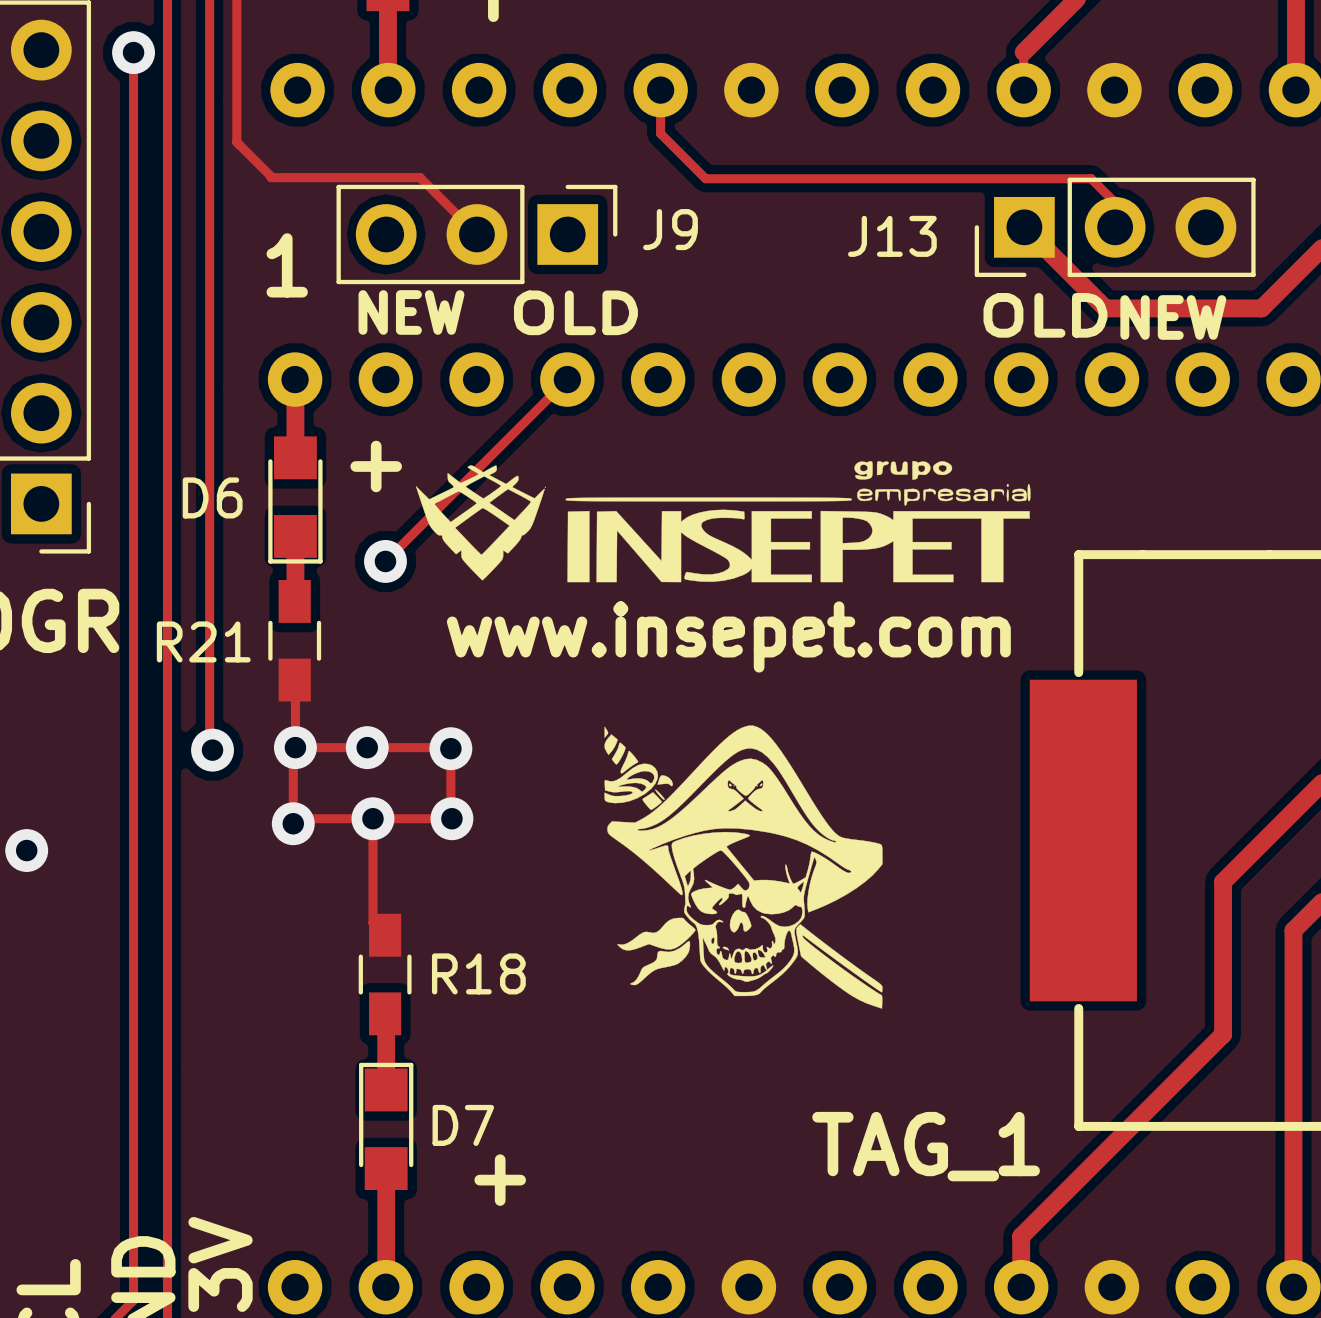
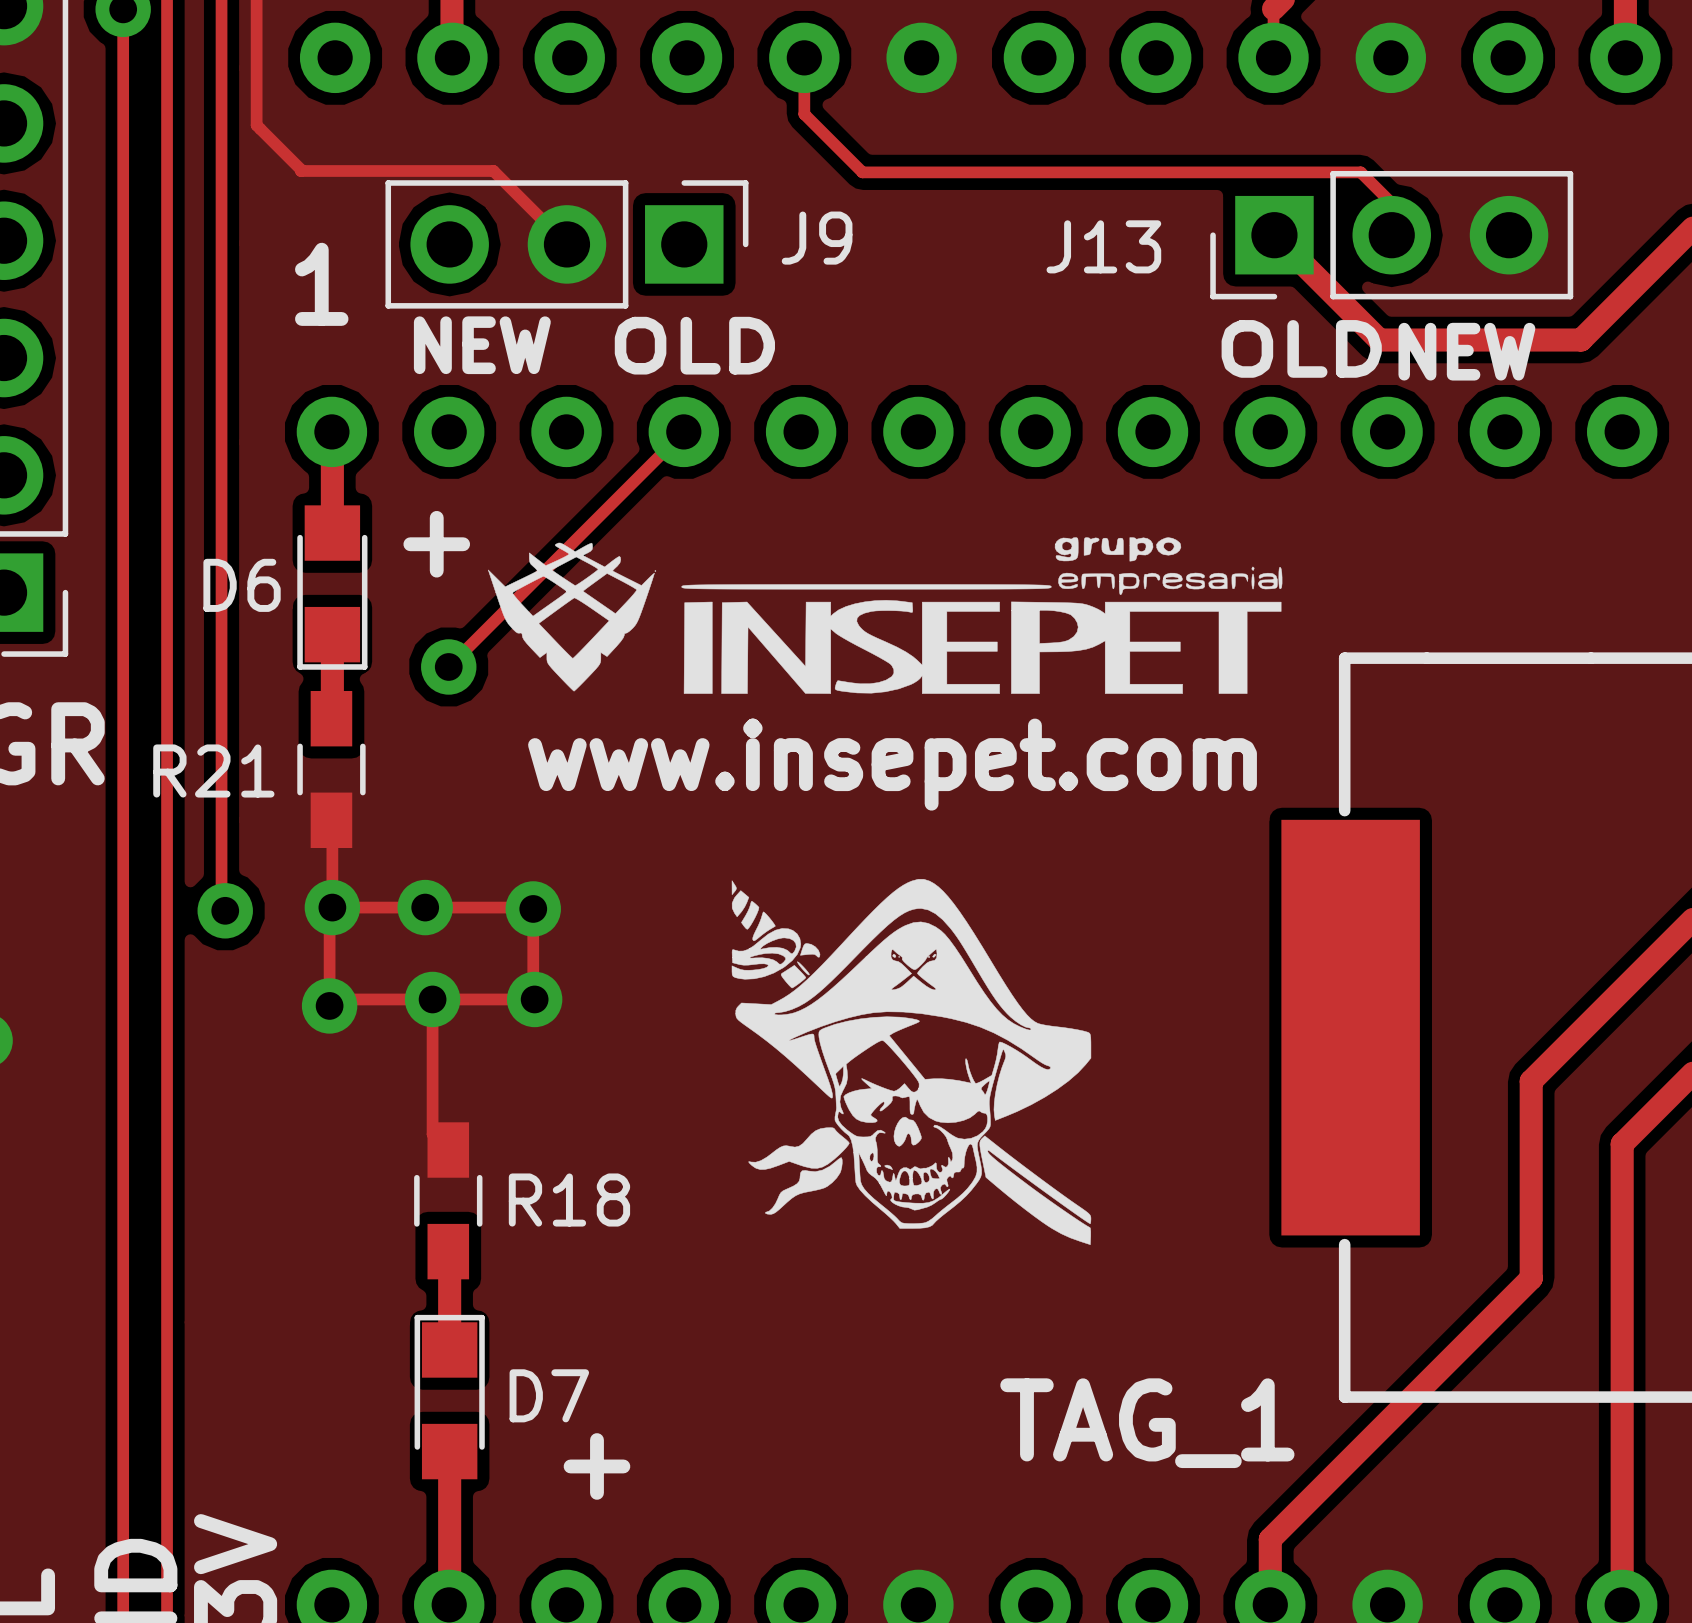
D6 name position: D6 (212, 497) -> D6 (242, 585)

